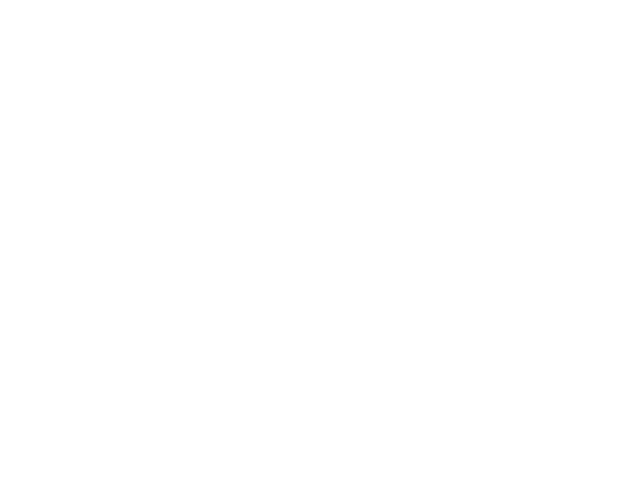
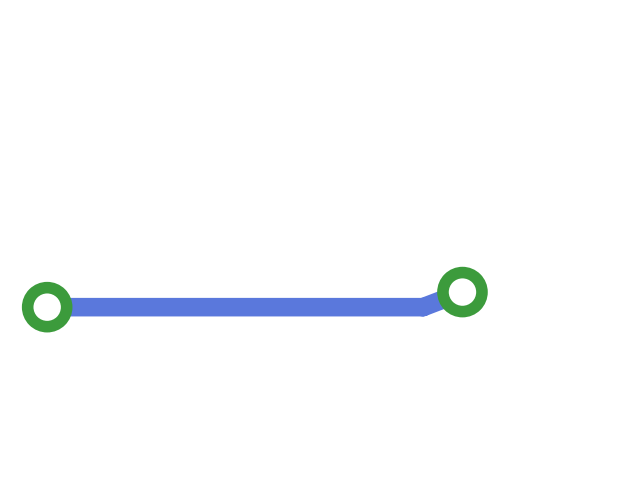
track: none -> (462, 292) (423, 307) (47, 307)
via: none -> (462, 292)
via: none -> (47, 307)

